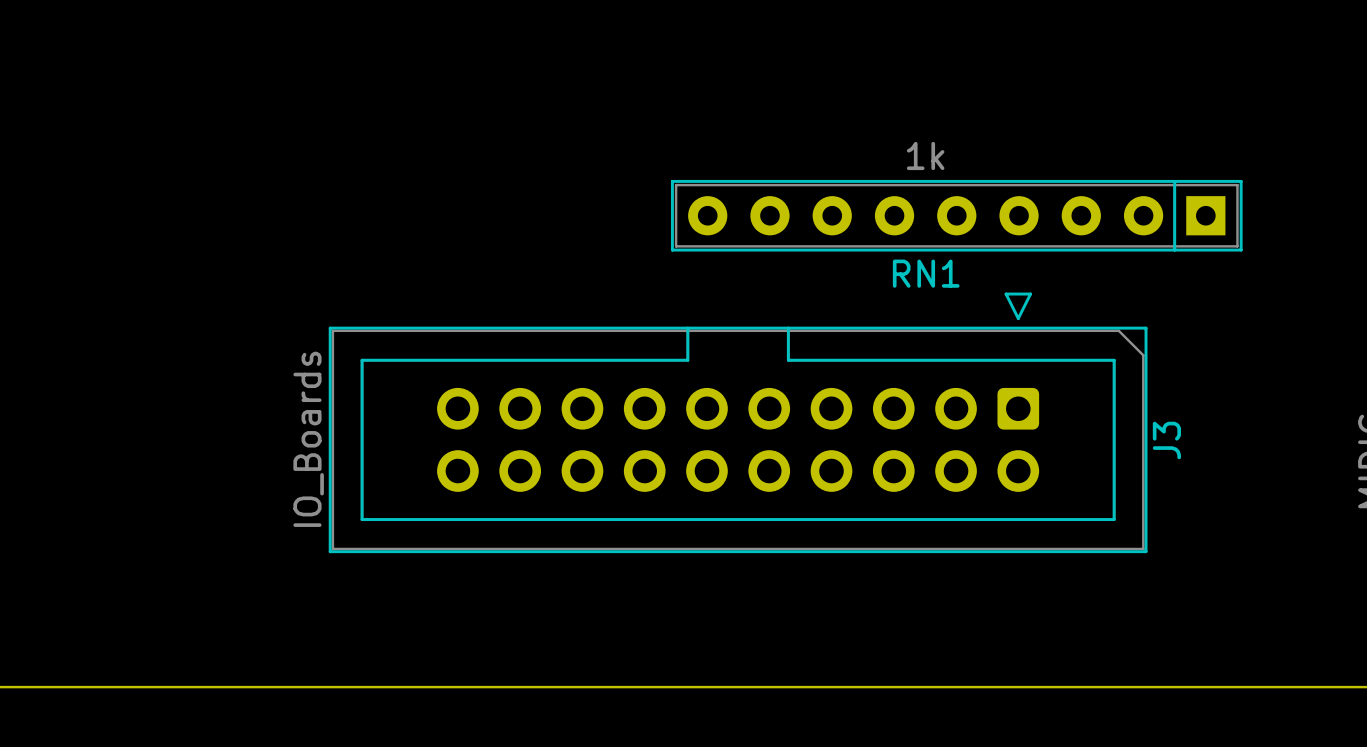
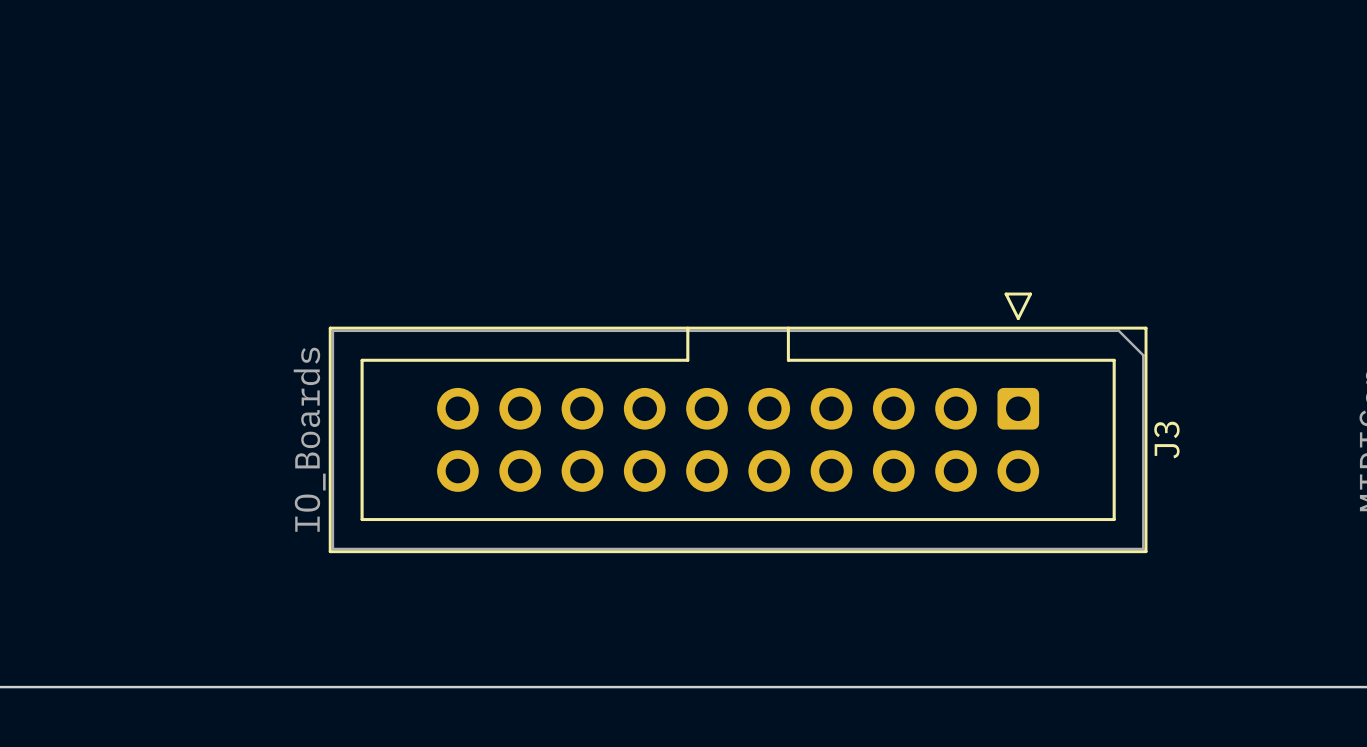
RN1: 1k (956, 215) -> none

